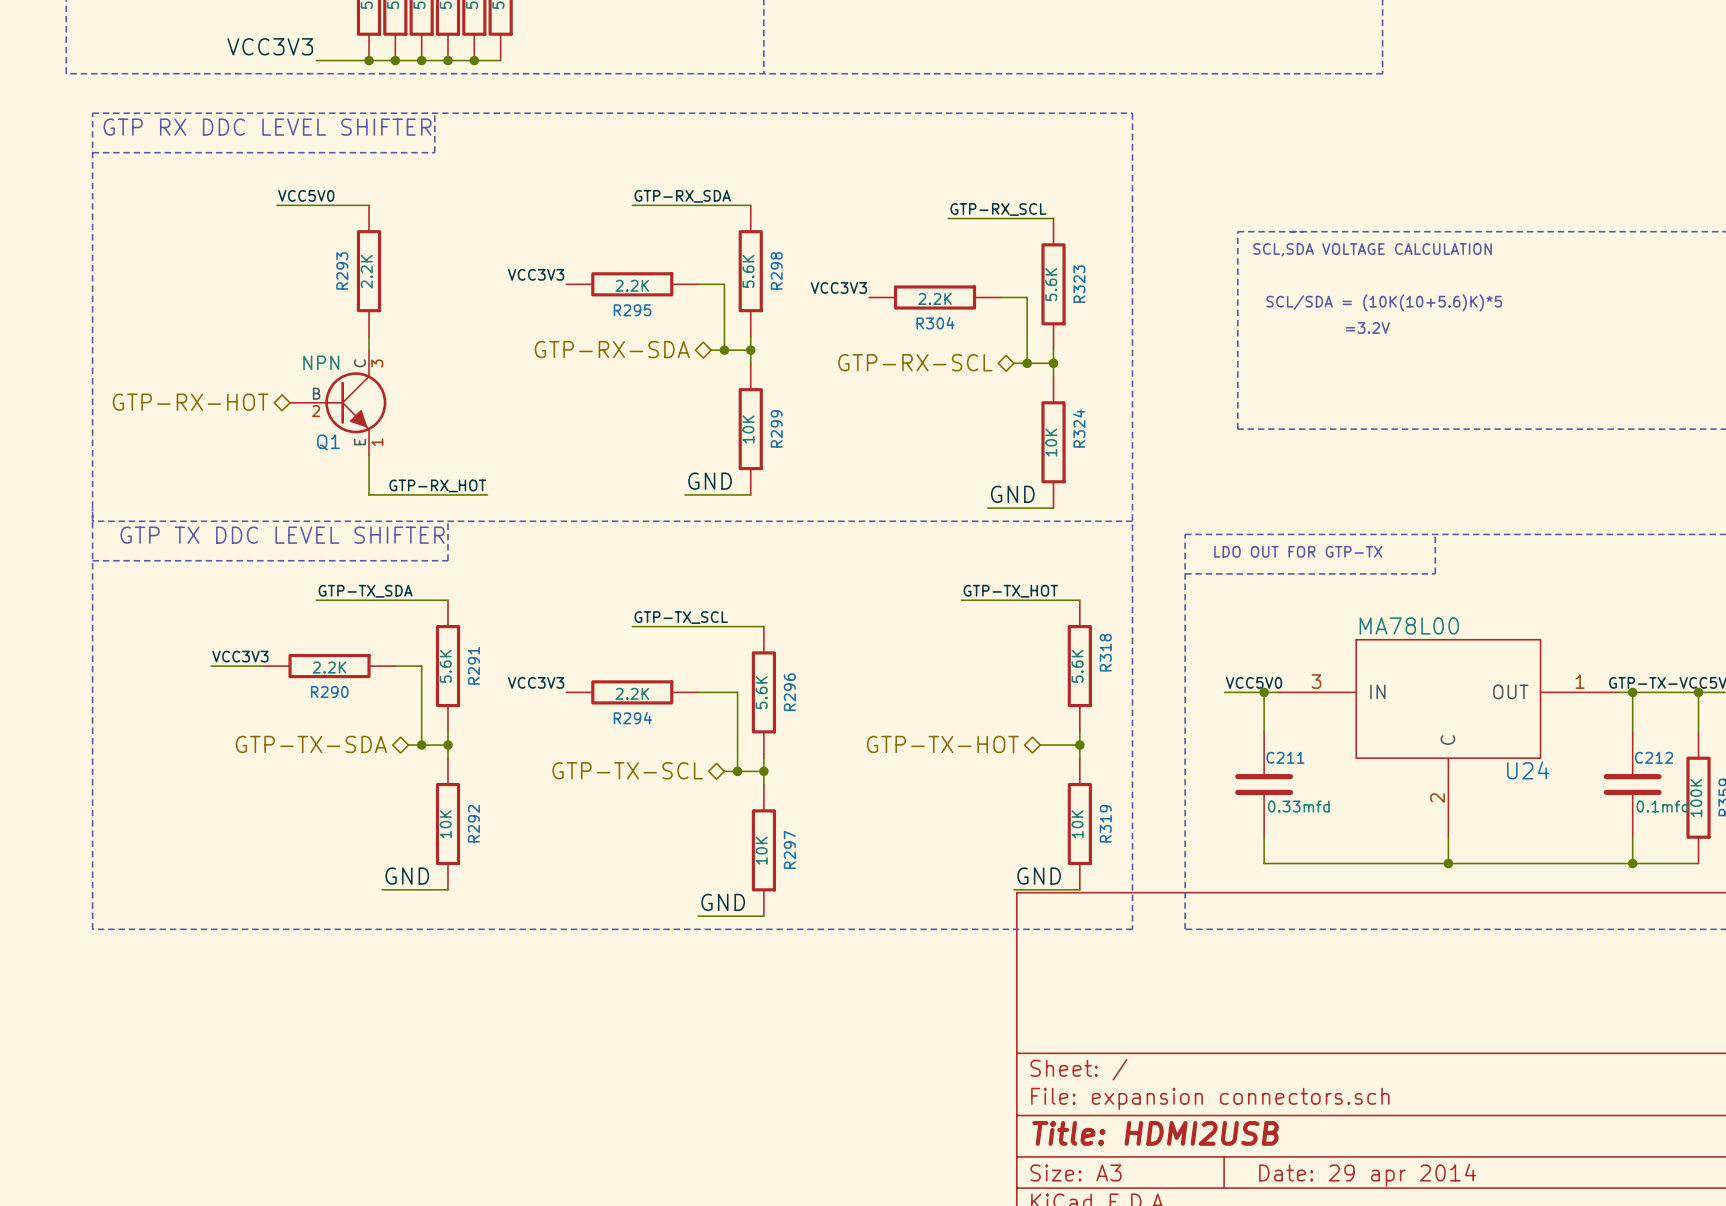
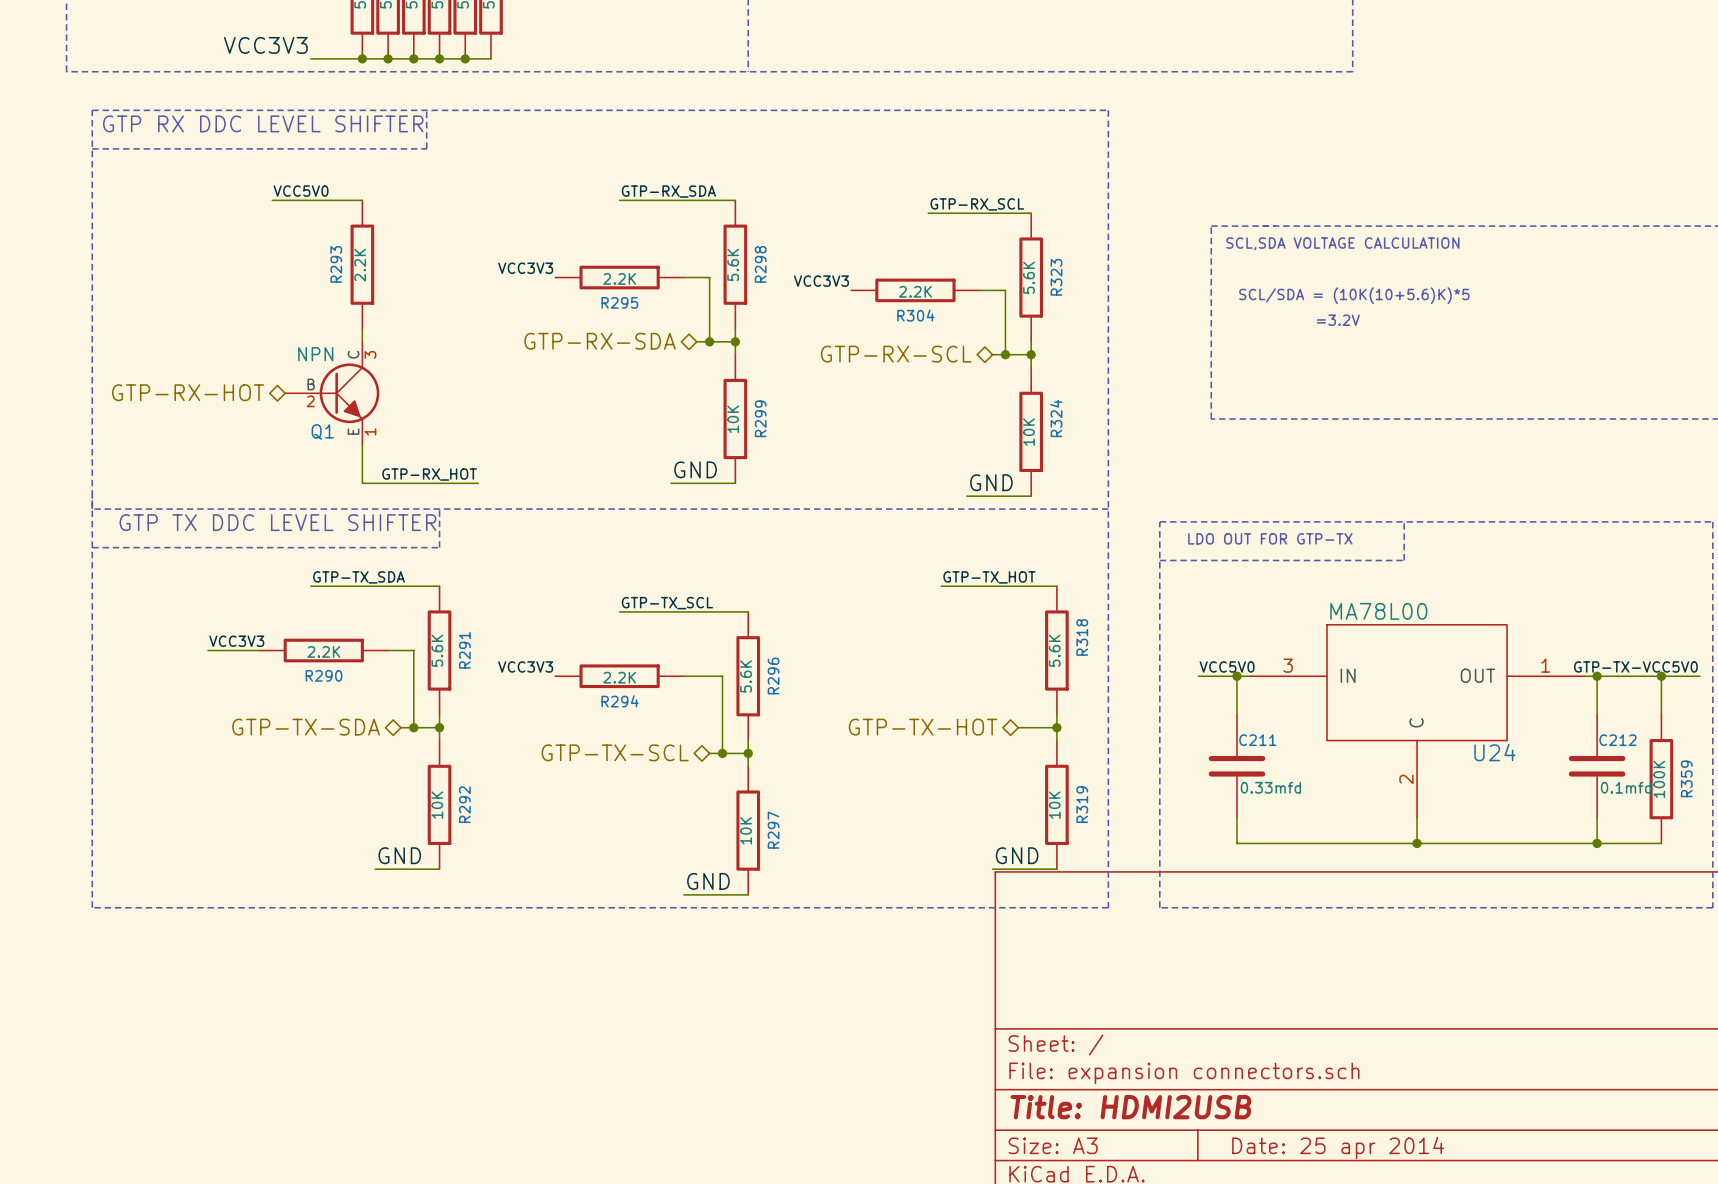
title block: Date: 29 apr 2014 (1367, 1175) -> Date: 25 apr 2014 (1338, 1147)

